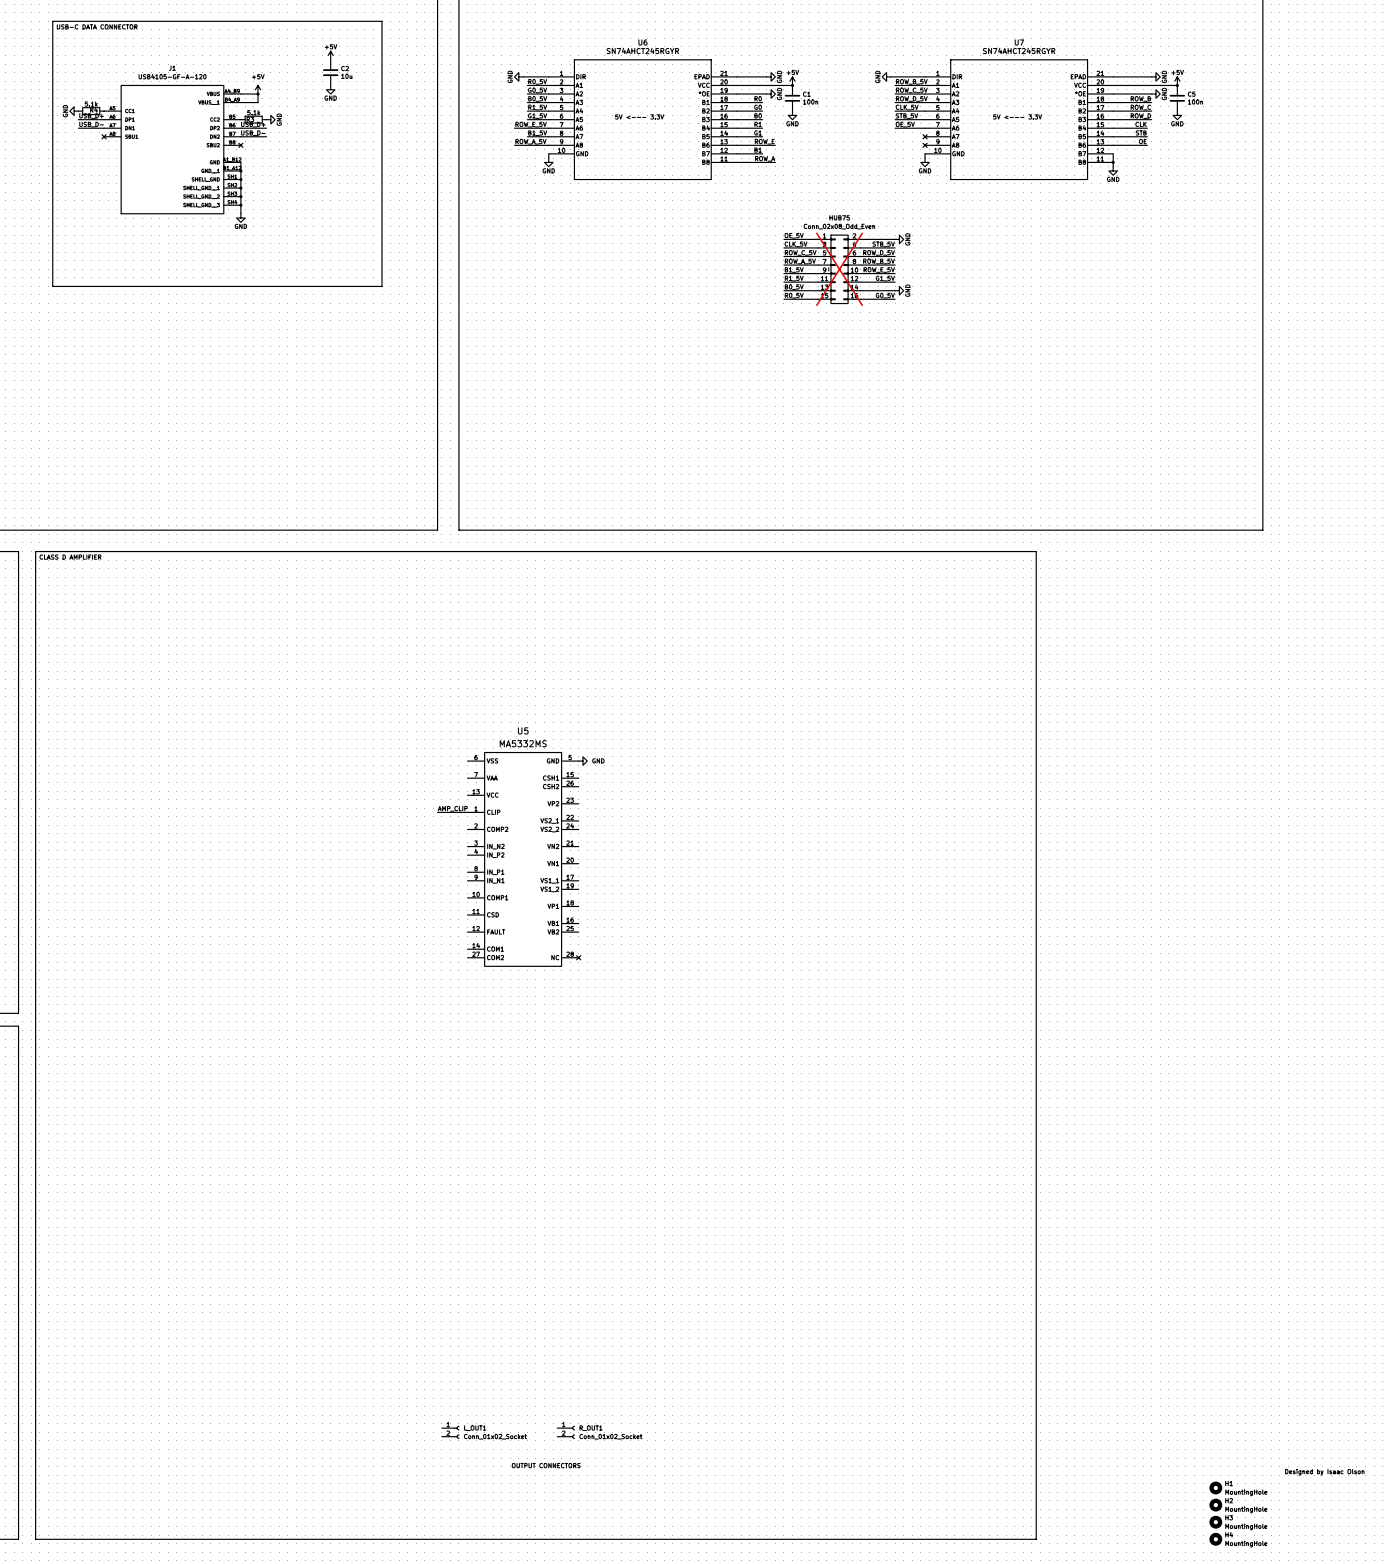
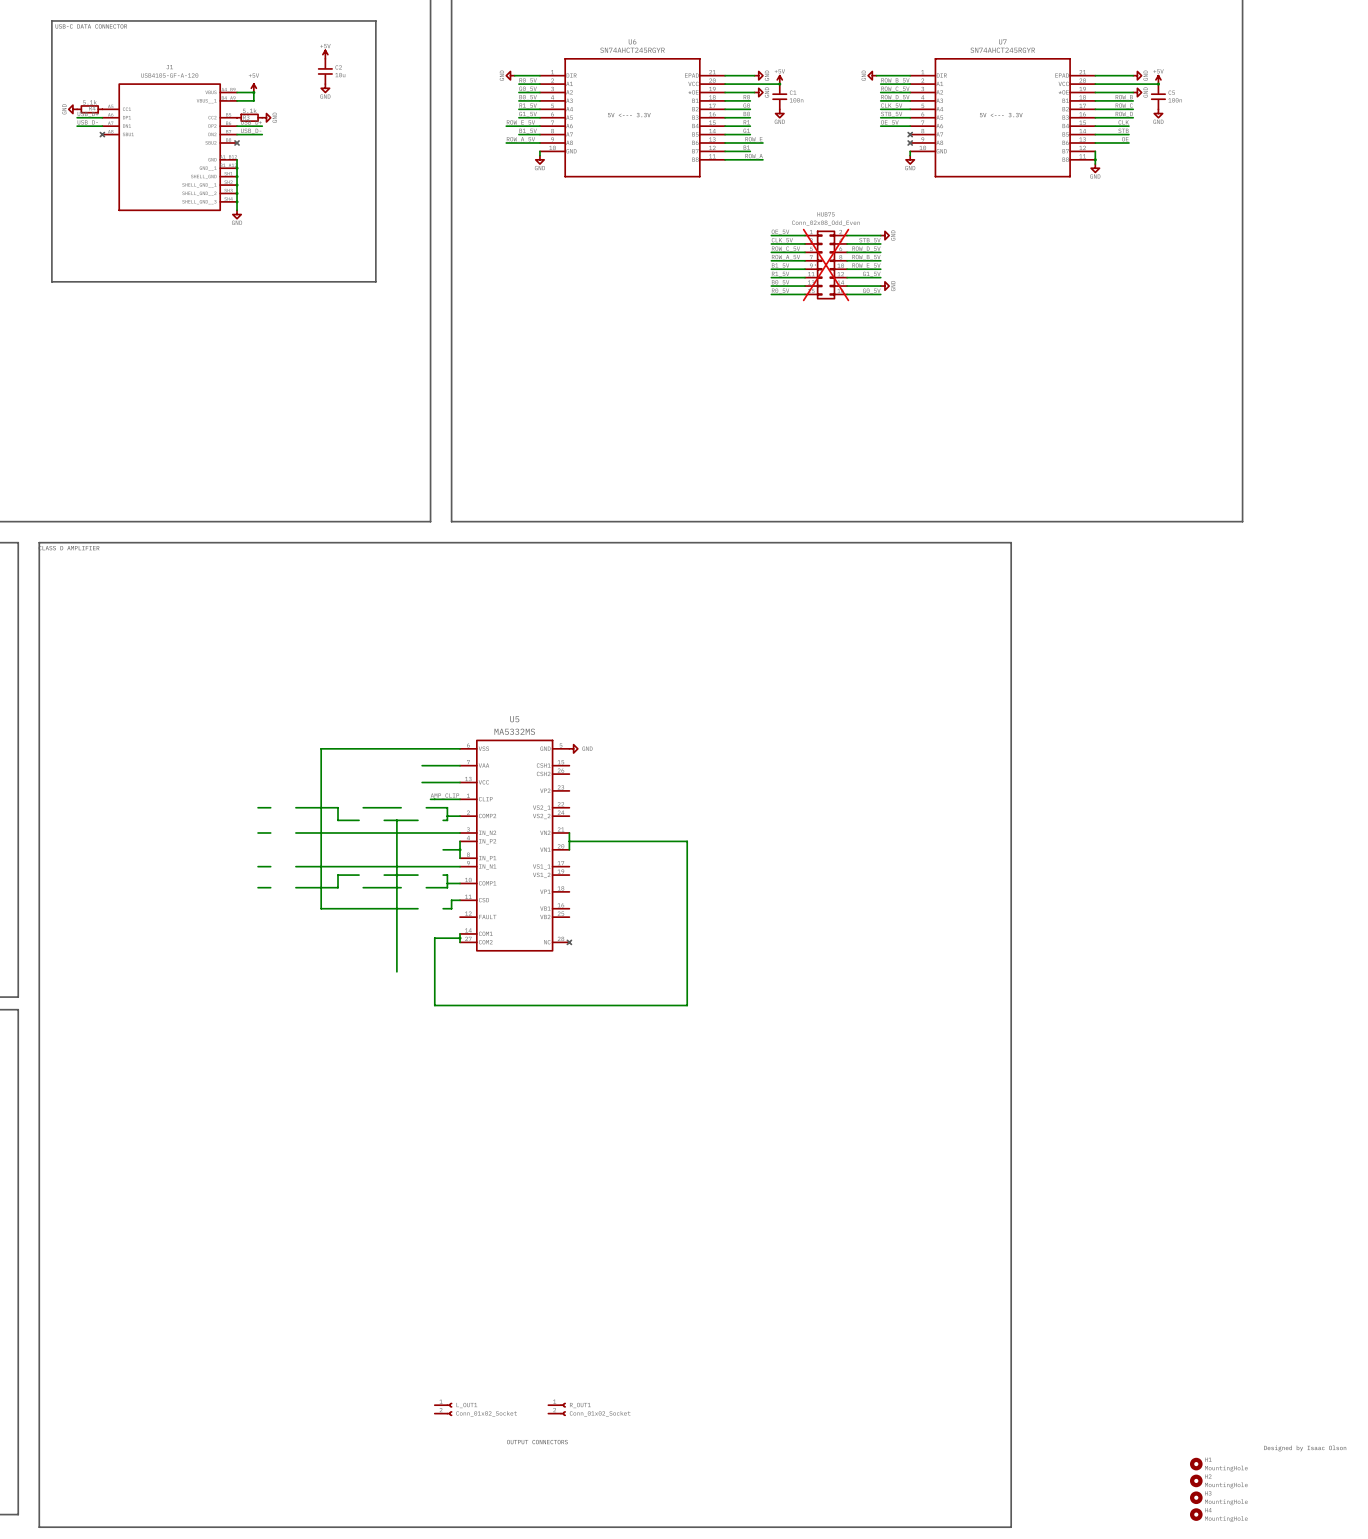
line: (39, 551) (35, 551) (35, 1539) (1036, 1539) (1036, 551) (1027, 551) -> (39, 542) (39, 1527) (1011, 1527) (1011, 542)
wire: none -> (460, 748) (321, 748) (321, 908) (417, 908)
wire: none -> (422, 765) (460, 765)
wire: none -> (422, 782) (460, 782)
wire: none -> (258, 807) (270, 807)
wire: none -> (295, 807) (338, 807) (338, 820) (359, 820)
wire: none -> (363, 807) (401, 807)
wire: none -> (426, 807) (447, 807) (447, 820) (443, 820)
wire: none -> (447, 816) (460, 816)
wire: none -> (384, 820) (417, 820)
wire: none -> (396, 820) (396, 971)
wire: none -> (258, 832) (270, 832)
wire: none -> (295, 832) (460, 832)
wire: none -> (569, 832) (569, 849)
wire: none -> (460, 841) (460, 858)
wire: none -> (569, 841) (687, 841) (687, 1005) (434, 1005) (434, 938) (460, 938)
wire: none -> (443, 849) (460, 849)
wire: none -> (258, 866) (270, 866)
wire: none -> (295, 866) (460, 866)
wire: none -> (359, 875) (338, 875) (338, 887) (295, 887)
wire: none -> (384, 875) (417, 875)
wire: none -> (443, 875) (447, 875) (447, 887) (426, 887)
wire: none -> (447, 883) (460, 883)
wire: none -> (258, 887) (270, 887)
wire: none -> (363, 887) (401, 887)
wire: none -> (460, 900) (451, 900) (451, 908) (443, 908)
wire: none -> (460, 933) (460, 942)

